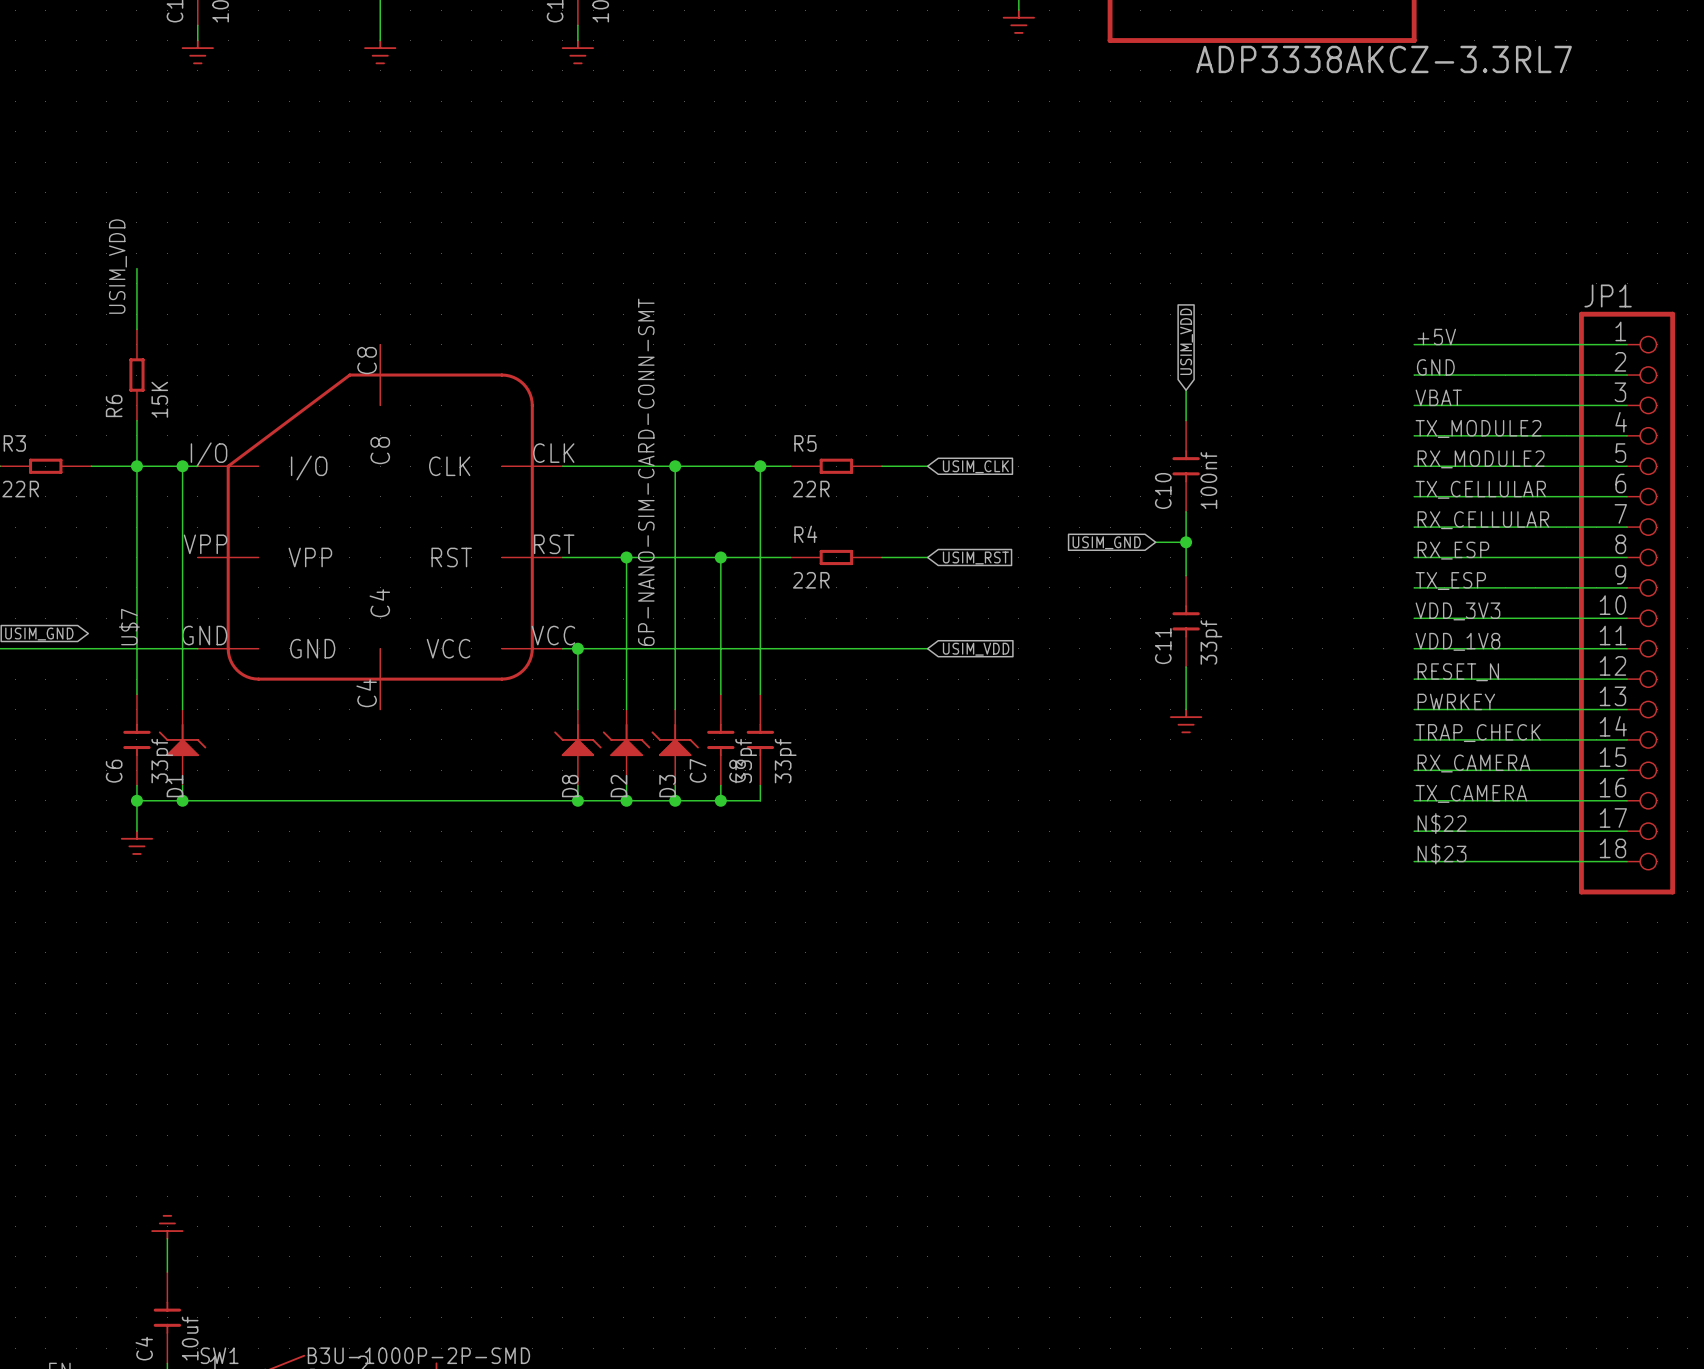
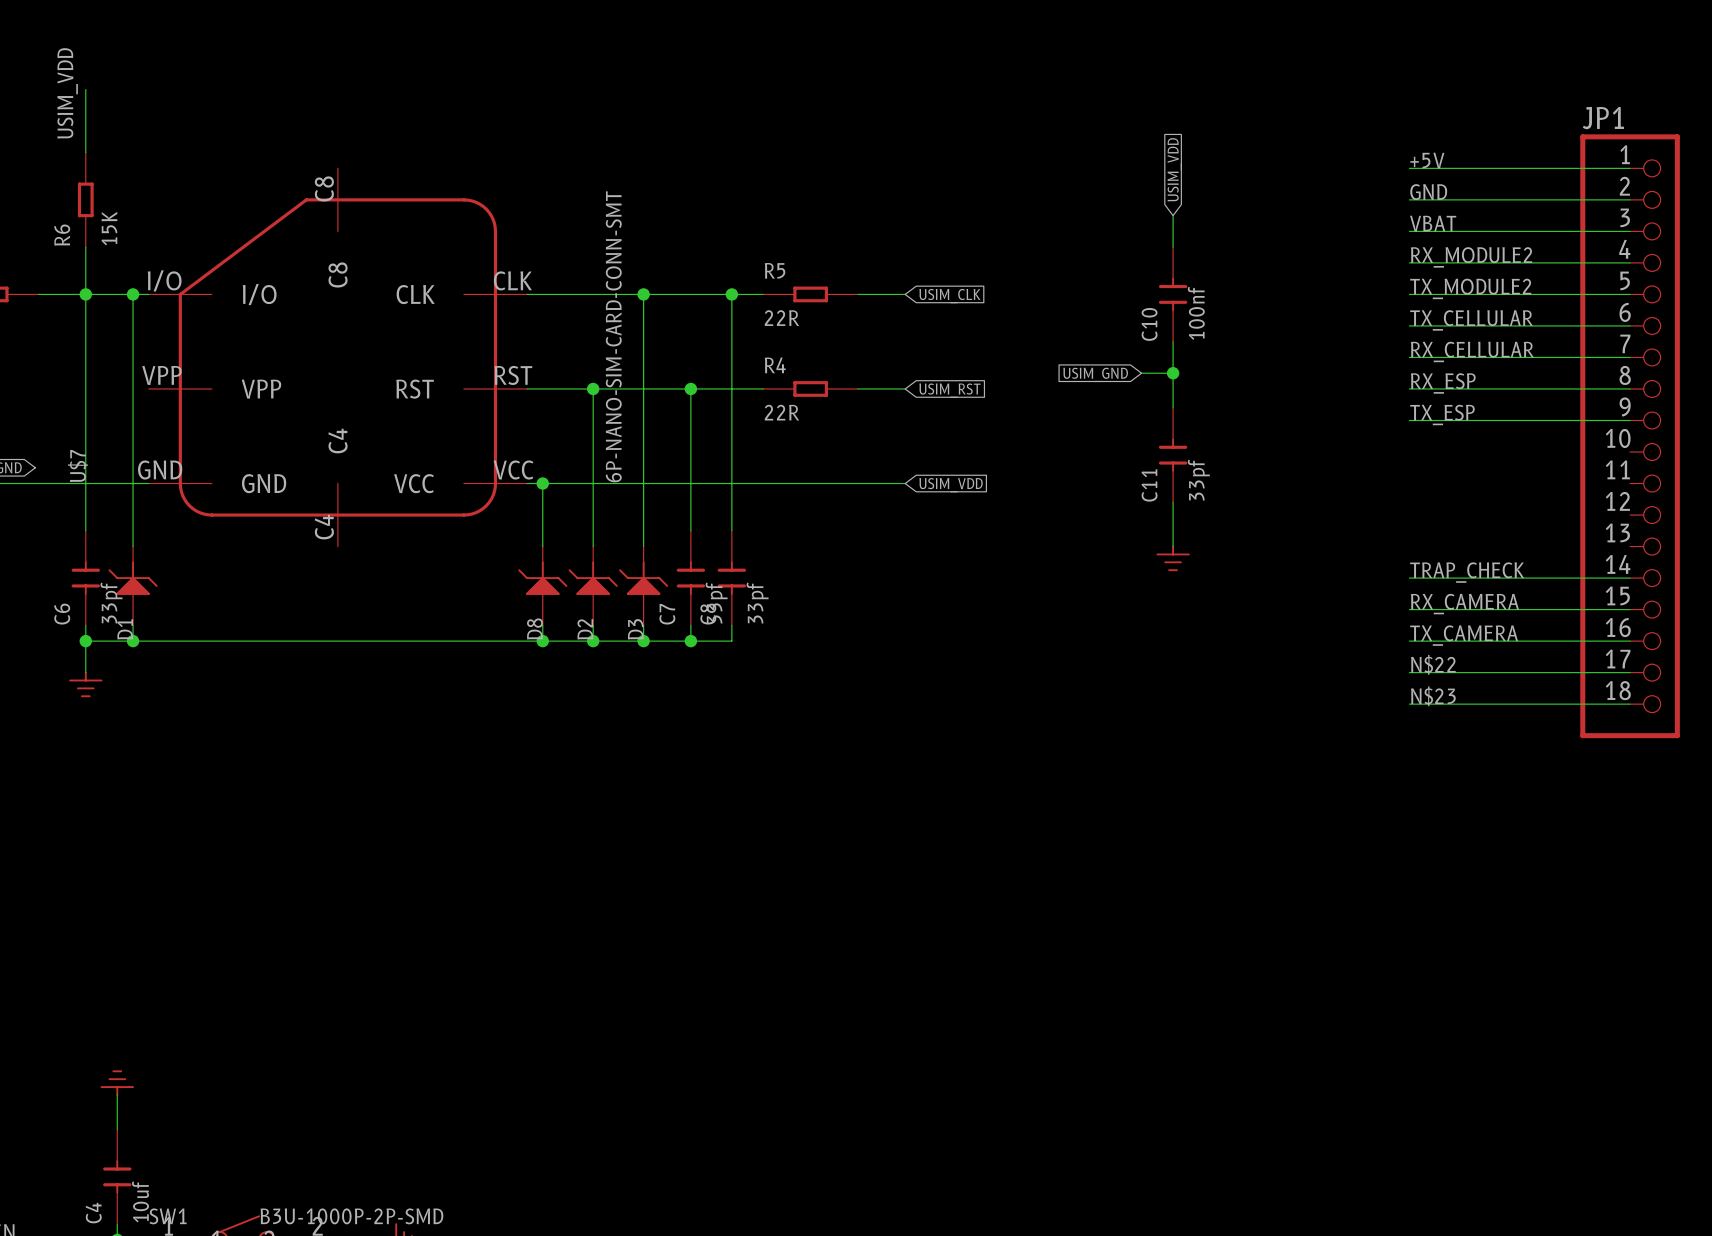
label: TX_MODULE2 (1478, 428) -> RX_MODULE2 (1471, 257)
label: RX_MODULE2 (1481, 459) -> TX_MODULE2 (1470, 288)
label: VDD_3V3 (1457, 611) -> none
wire: (1414, 618) (1627, 618) -> none
label: VDD_1V8 (1457, 641) -> none
wire: (1414, 648) (1627, 648) -> none
label: RESET_N (1458, 672) -> none
wire: (1414, 679) (1627, 679) -> none
label: PWRKEY (1456, 701) -> none
wire: (1414, 709) (1627, 709) -> none

